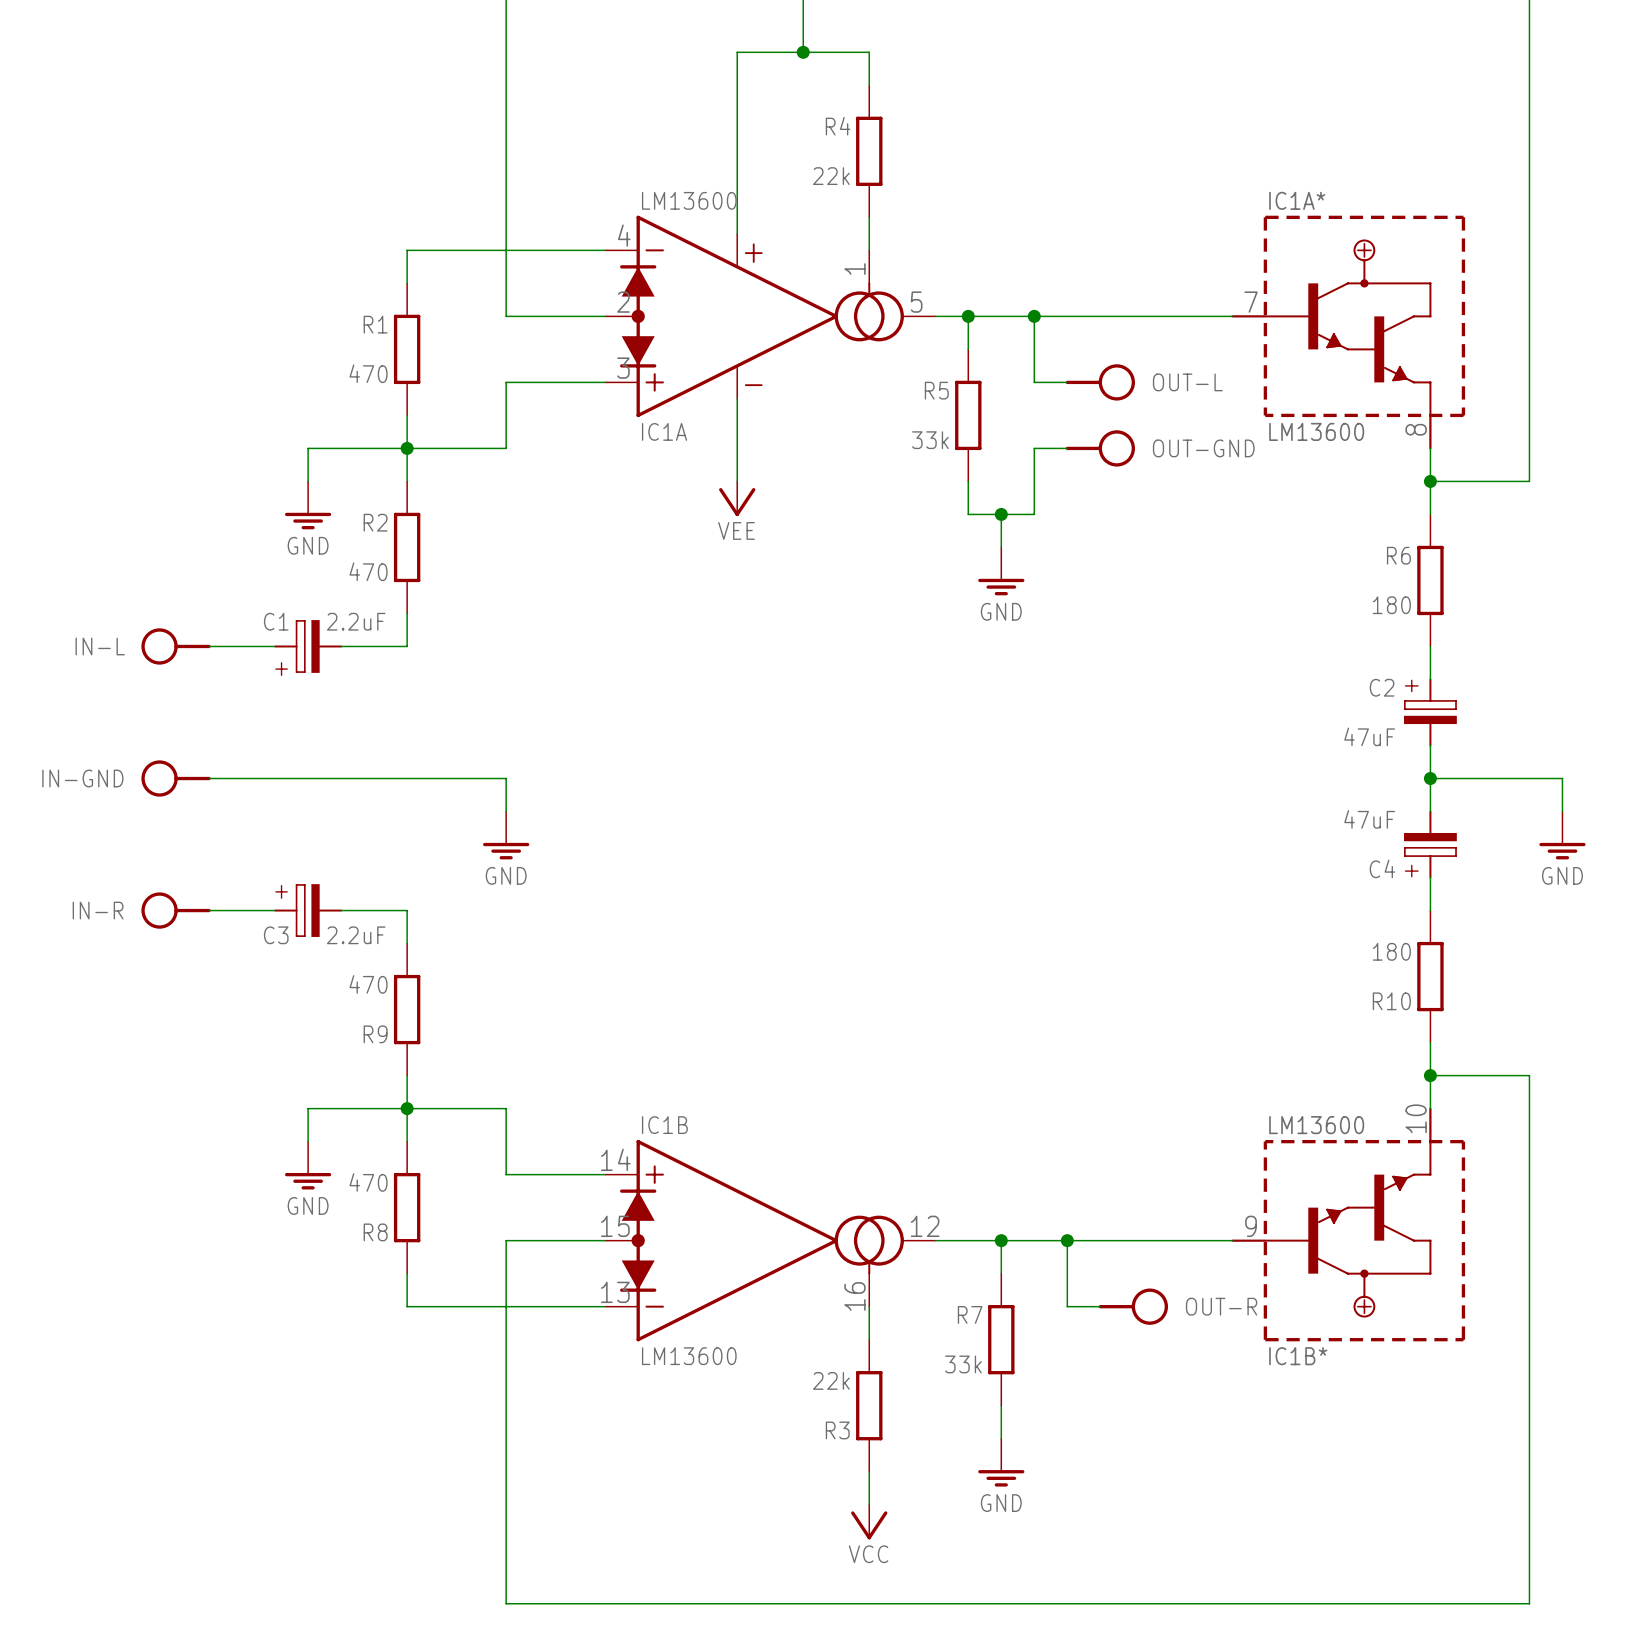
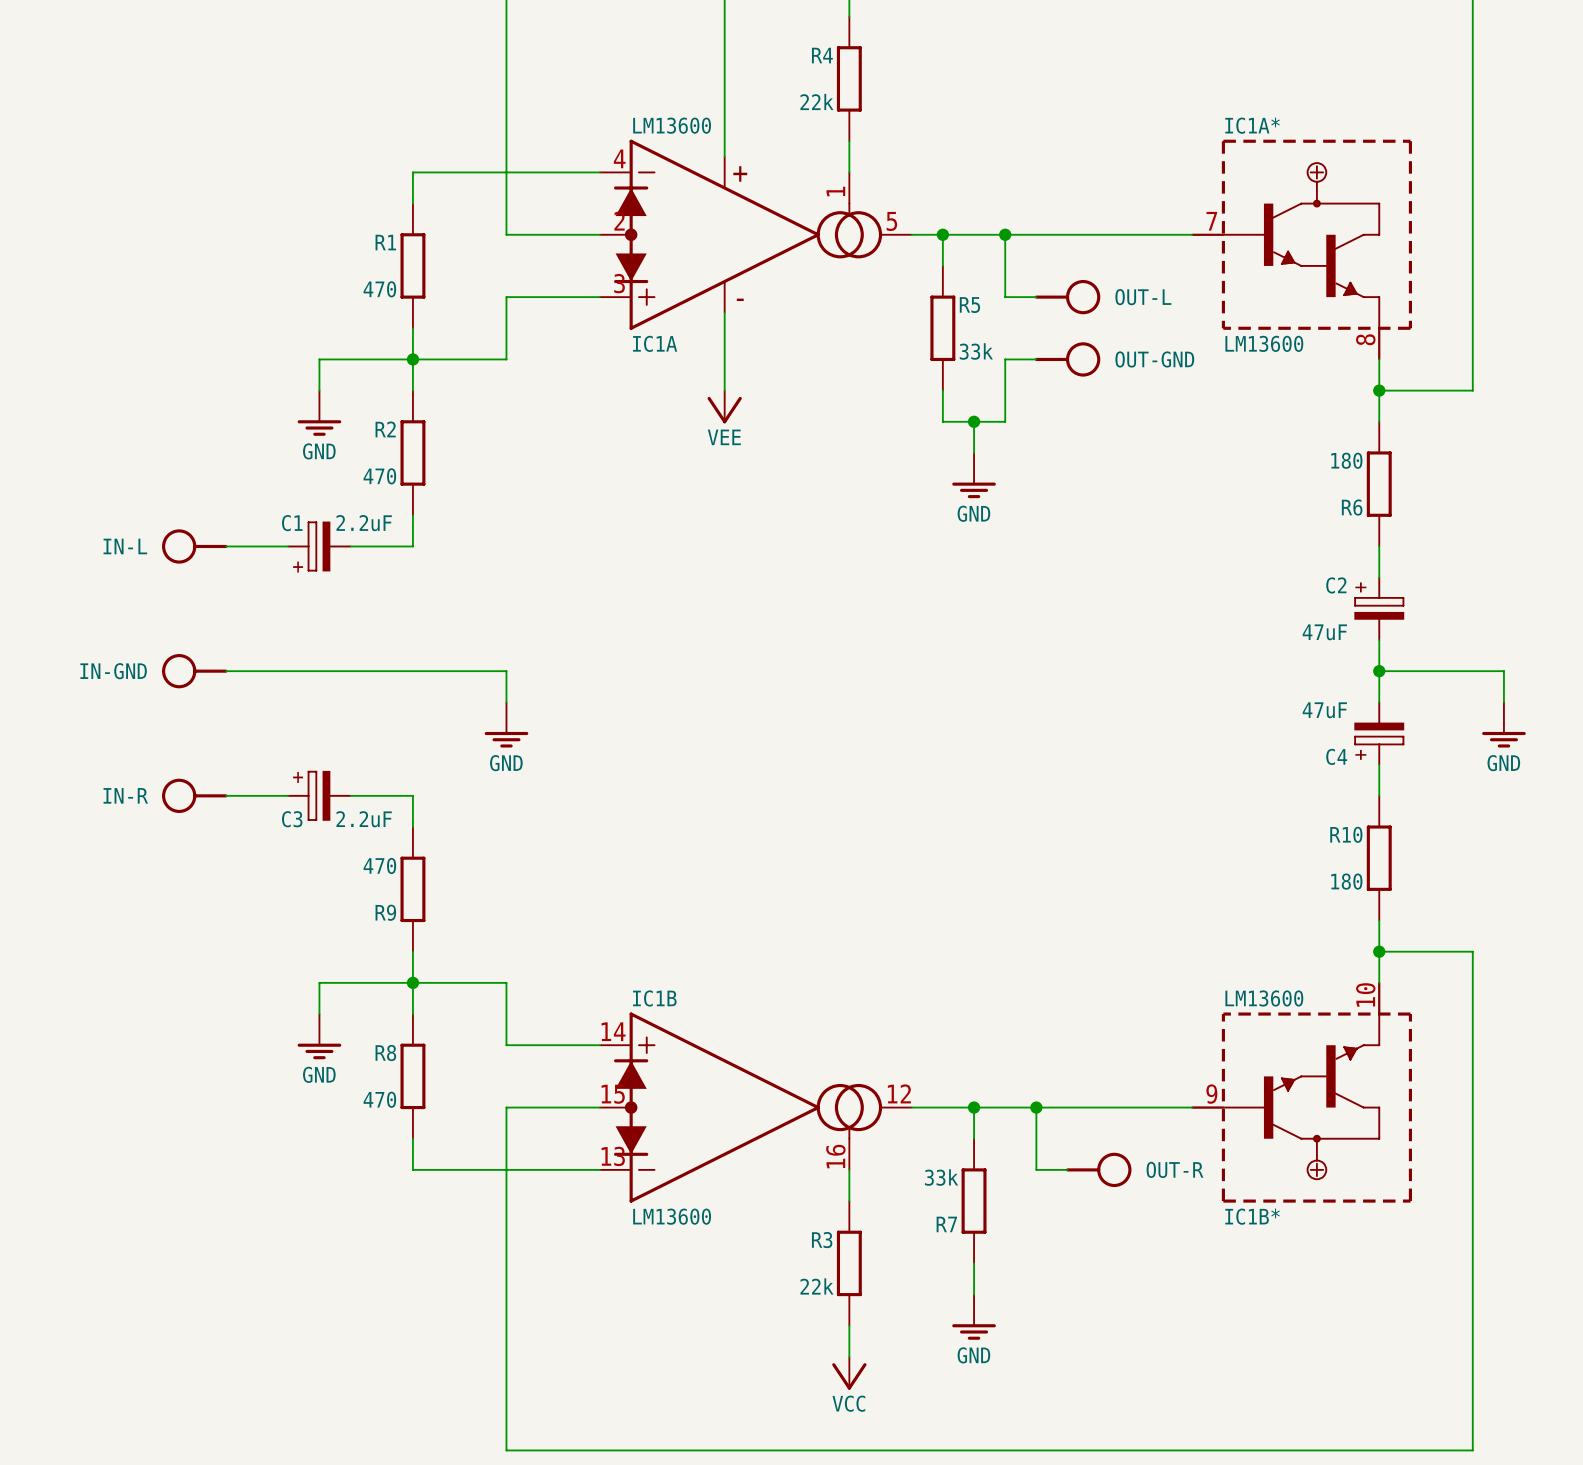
R5 name position: R5 (936, 390) -> R5 (969, 305)
R5 value position: 33k (930, 440) -> 33k (976, 351)
R6 name position: R6 (1398, 555) -> R6 (1352, 507)
R6 value position: 180 (1391, 605) -> 180 (1346, 460)
R10 value position: 180 (1391, 951) -> 180 (1346, 881)
R10 name position: R10 (1391, 1001) -> R10 (1346, 834)
R8 value position: 470 (368, 1182) -> 470 (379, 1099)
R8 name position: R8 (375, 1232) -> R8 (385, 1053)
R7 name position: R7 (970, 1314) -> R7 (946, 1224)
R7 value position: 33k (963, 1364) -> 33k (941, 1177)
R3 value position: 22k (831, 1380) -> 22k (816, 1286)
R3 name position: R3 (837, 1430) -> R3 (822, 1240)

